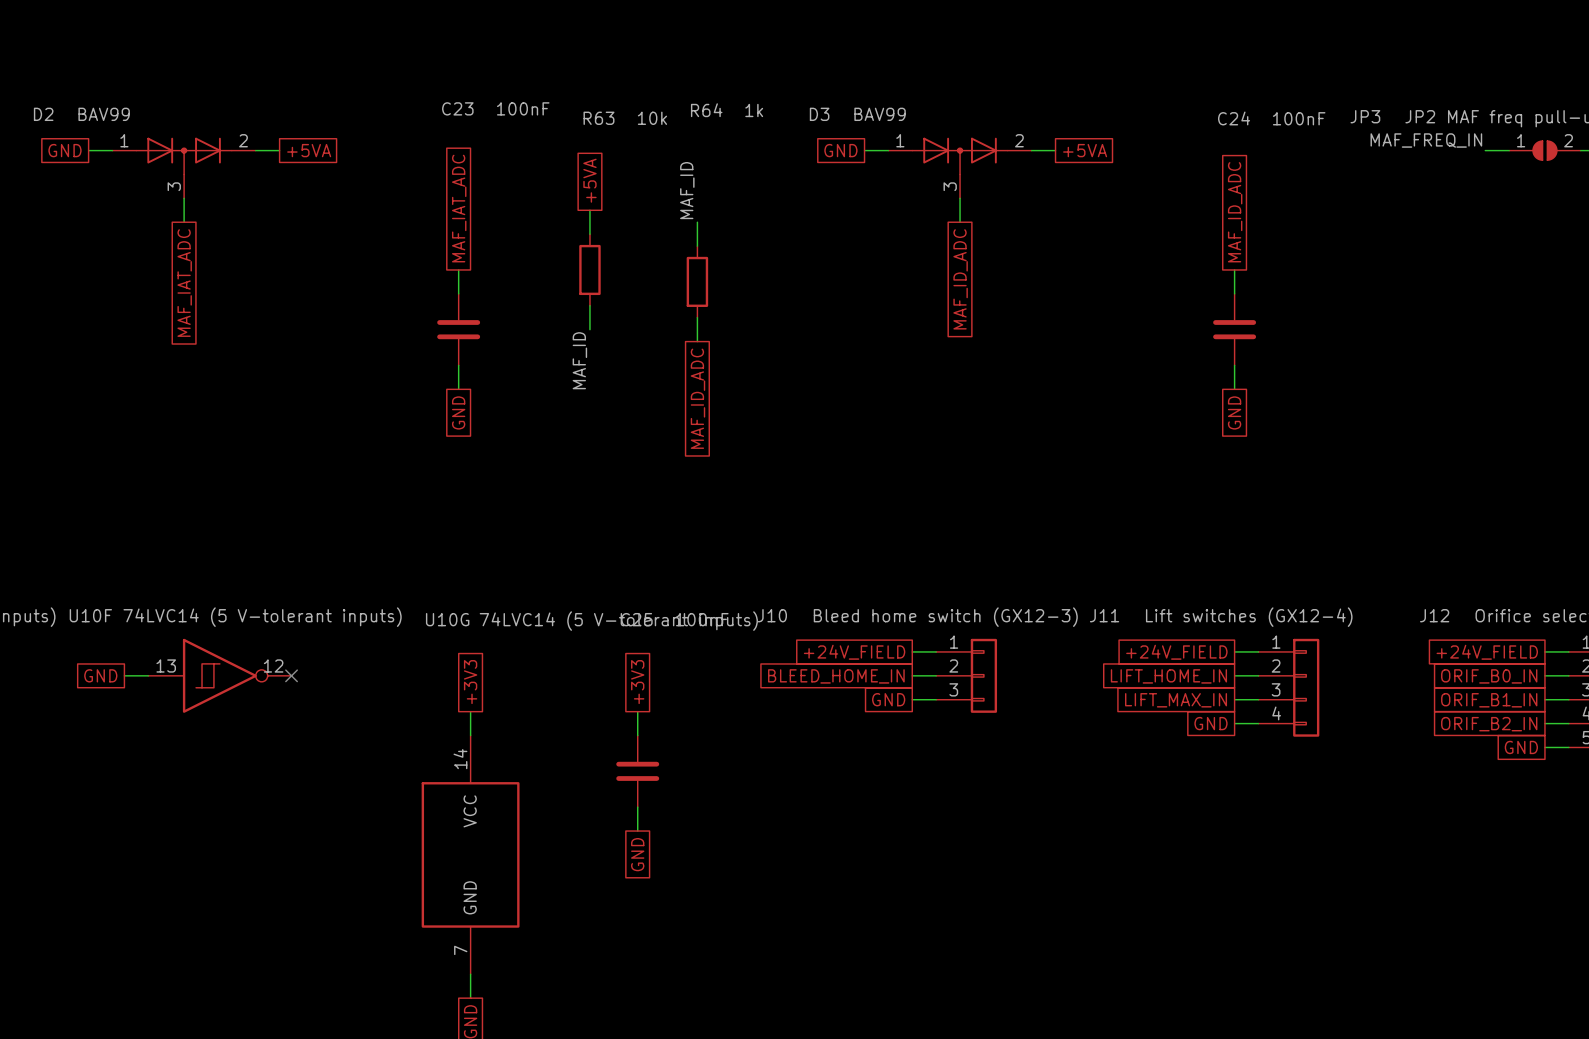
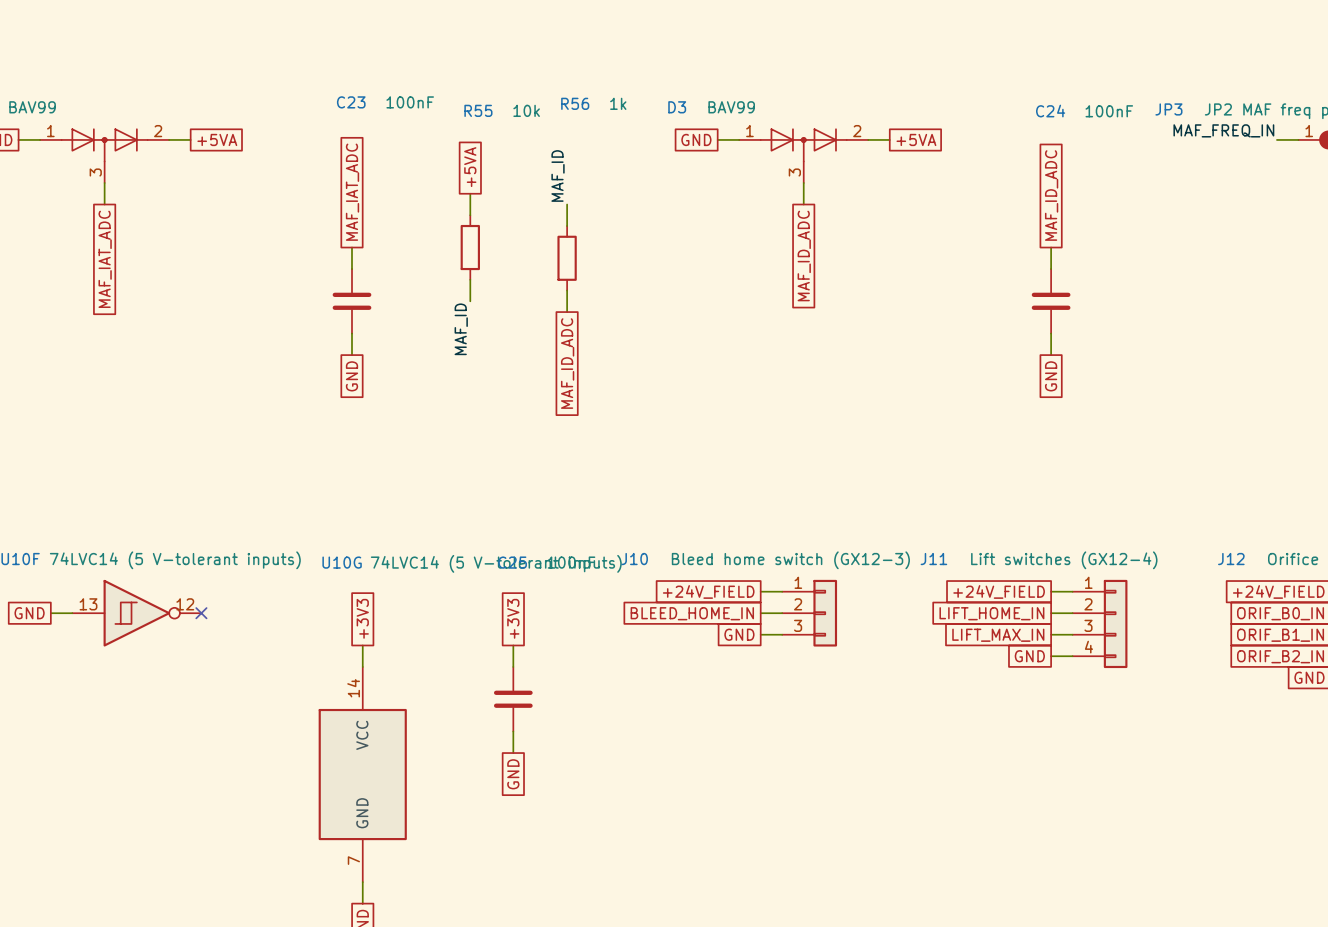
R64 name: R64 (706, 110) -> R56 (575, 103)
R63 name: R63 (598, 118) -> R55 (478, 110)

